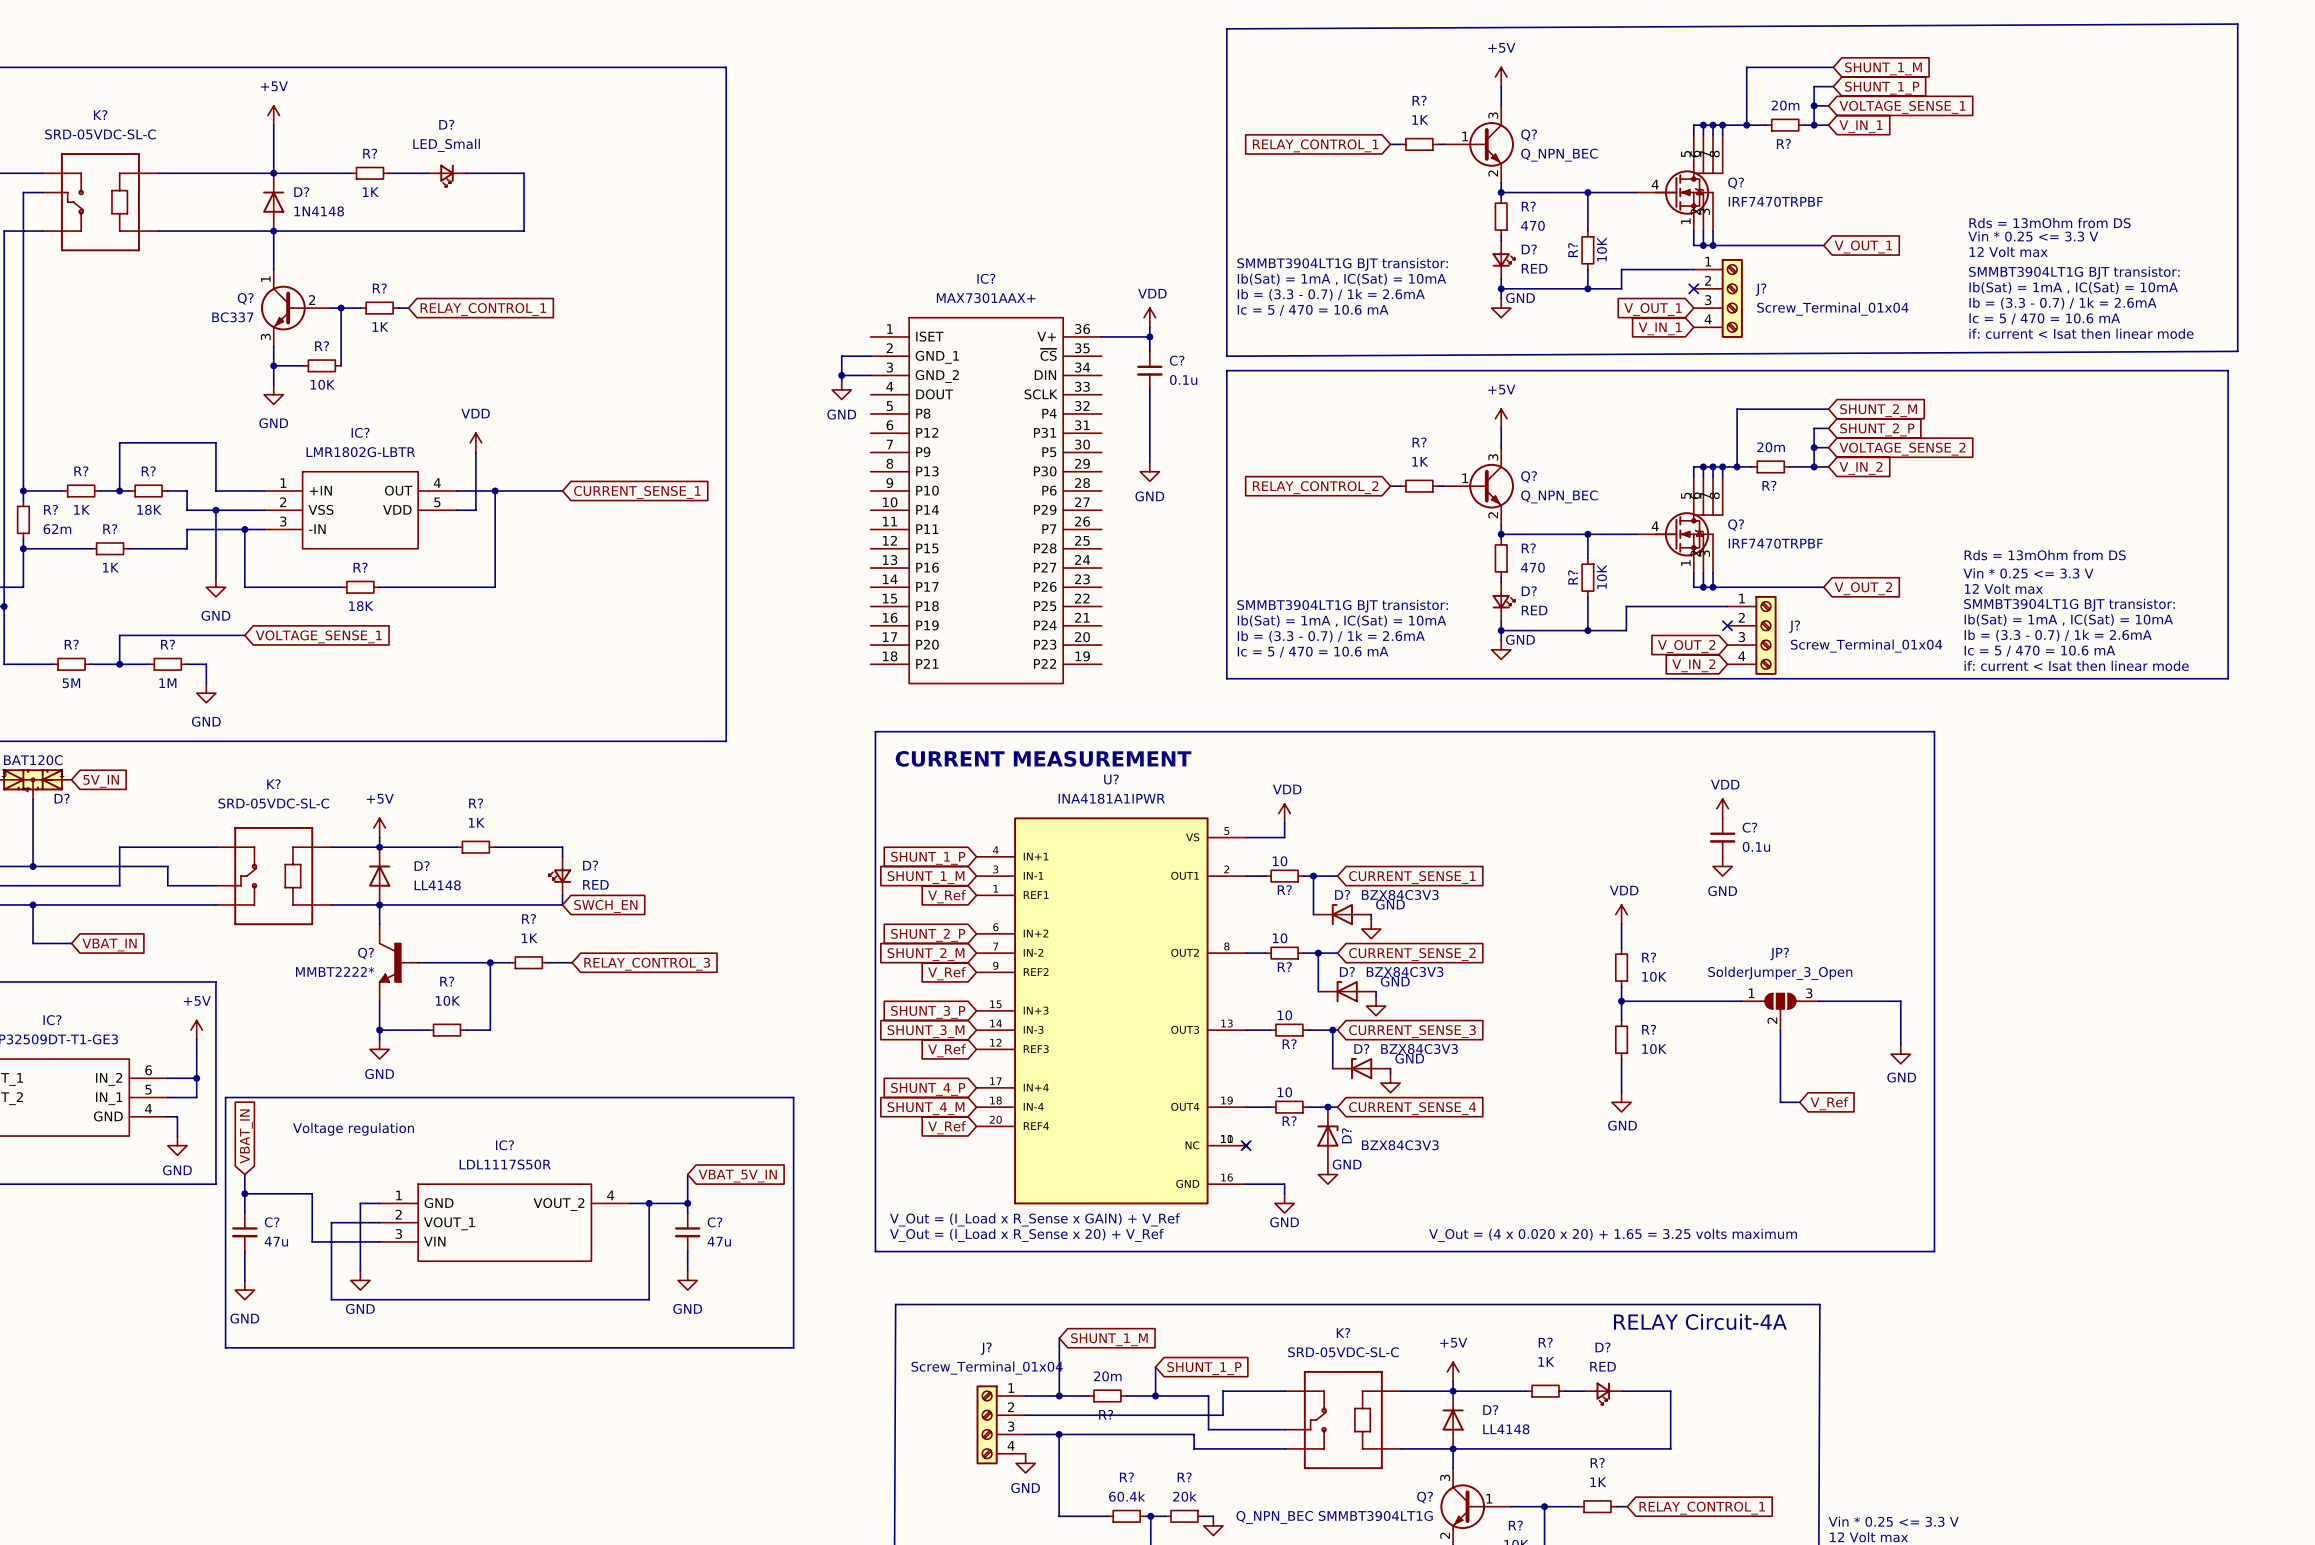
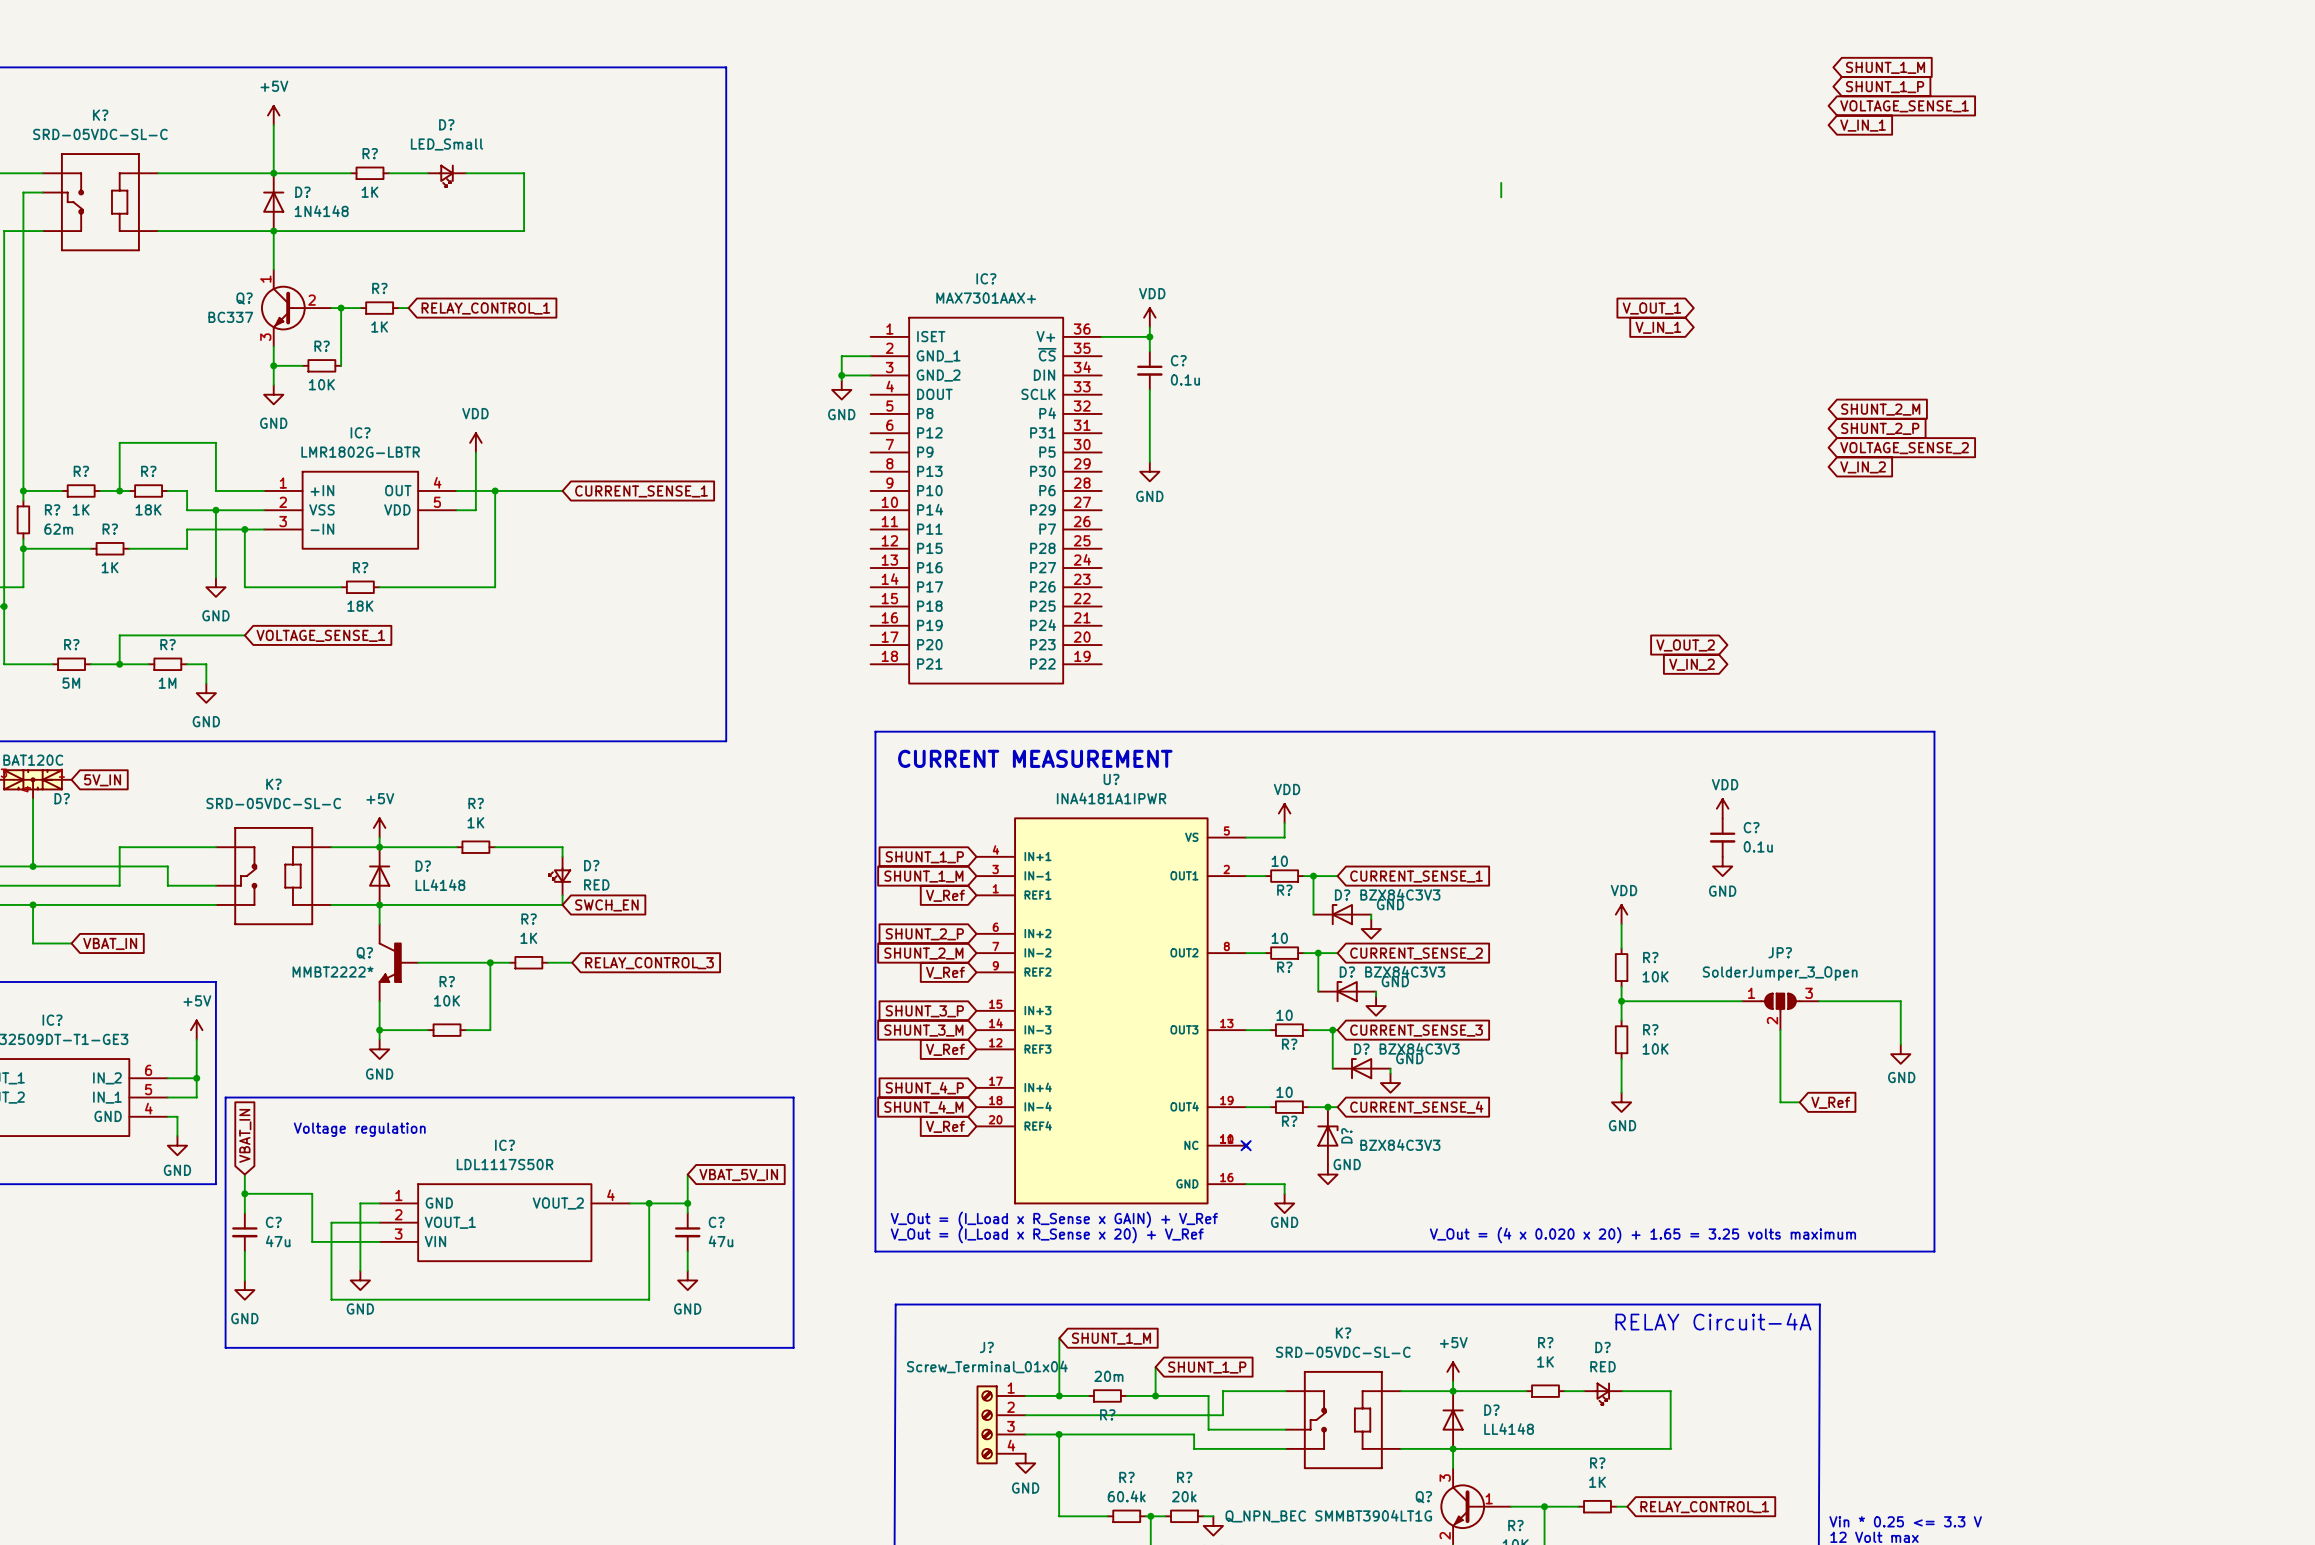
line: (2237, 24) (1226, 28) (1226, 356) (2237, 351) (2237, 24) -> none
wire: (1833, 67) (1746, 67) (1746, 125) -> none
power symbol: +5V (1501, 77) -> none
wire: (1501, 86) (1501, 105) -> none
wire: (1833, 86) (1814, 86) (1814, 125) -> none
wire: (1814, 105) (1828, 105) -> none
junction: (1814, 105) -> none
wire: (1703, 125) (1703, 134) -> none
junction: (1703, 125) -> none
wire: (1713, 125) (1713, 134) -> none
junction: (1713, 125) -> none
wire: (1722, 125) (1722, 134) -> none
junction: (1722, 125) -> none
junction: (1746, 125) -> none
wire: (1765, 125) (1693, 125) (1693, 134) -> none
R?: 20m (1785, 125) -> none
wire: (1804, 125) (1828, 125) -> none
junction: (1814, 125) -> none
wire: (1390, 144) (1400, 144) -> none
R?: 1K (1419, 144) -> none
wire: (1438, 144) (1443, 144) -> none
Q?: Q_NPN_BEC (1478, 144) -> none
global label: RELAY_CONTROL_1 (1315, 145) -> none
Q?: IRF7470TRPBF (1679, 182) -> none
wire: (1501, 192) (1636, 192) -> none
junction: (1501, 192) -> none
wire: (1587, 192) (1587, 231) -> none
junction: (1587, 192) -> none
R?: 470 (1501, 216) -> none
text: Rds = 13mOhm from DS (2050, 223) -> none
wire: (1693, 231) (1693, 245) (1823, 245) -> none
wire: (1703, 231) (1703, 245) -> none
wire: (1713, 231) (1713, 245) -> none
wire: (1501, 235) (1501, 240) -> none
text: Vin * 0.25 <= 3.3 V (2033, 236) -> none
junction: (1703, 245) -> none
junction: (1713, 245) -> none
global label: V_OUT_1 (1863, 246) -> none
R?: 10K (1587, 250) -> none
text: 12 Volt max (2008, 251) -> none
D?: RED (1503, 259) -> none
text: SMMBT3904LT1G BJT transistor: (1342, 264) -> none
wire: (1587, 269) (1587, 288) -> none
wire: (1693, 269) (1621, 269) (1621, 288) (1501, 288) -> none
text: SMMBT3904LT1G BJT transistor: (2074, 273) -> none
text: Ib(Sat) = 1mA , IC(Sat) = 10mA (1341, 279) -> none
wire: (1501, 279) (1501, 298) -> none
junction: (1501, 288) -> none
junction: (1587, 288) -> none
no-connect mark: (1693, 288) -> none
text: Ib(Sat) = 1mA , IC(Sat) = 10mA (2073, 288) -> none
text: Ib = (3.3 - 0.7) / 1k = 2.6mA (1331, 294) -> none
J?: Screw_Terminal_01x04 (1718, 298) -> none
text: Ib = (3.3 - 0.7) / 1k = 2.6mA (2062, 303) -> none
power symbol: GND (1501, 308) -> none
text: Ic = 5 / 470 = 10.6 mA (1313, 310) -> none
text: Ic = 5 / 470 = 10.6 mA (2044, 318) -> none
text: if: current < Isat then linear mode (2081, 333) -> none
line: (1226, 370) (1226, 678) (2228, 678) (2228, 370) (1226, 370) -> none
wire: (1828, 409) (1737, 409) (1737, 466) -> none
power symbol: +5V (1501, 418) -> none
wire: (1501, 428) (1501, 447) -> none
wire: (1828, 428) (1814, 428) (1814, 466) -> none
wire: (1814, 447) (1828, 447) -> none
junction: (1814, 447) -> none
wire: (1703, 466) (1703, 476) -> none
junction: (1703, 466) -> none
wire: (1713, 466) (1713, 476) -> none
junction: (1713, 466) -> none
wire: (1722, 466) (1722, 476) -> none
junction: (1722, 466) -> none
junction: (1737, 466) -> none
wire: (1751, 466) (1693, 466) (1693, 476) -> none
R?: 20m (1770, 466) -> none
wire: (1790, 466) (1828, 466) -> none
junction: (1814, 466) -> none
wire: (1390, 486) (1400, 486) -> none
R?: 1K (1419, 486) -> none
wire: (1438, 486) (1443, 486) -> none
Q?: Q_NPN_BEC (1478, 486) -> none
global label: RELAY_CONTROL_2 (1315, 487) -> none
wire: (1501, 524) (1501, 539) -> none
Q?: IRF7470TRPBF (1679, 524) -> none
wire: (1501, 534) (1636, 534) -> none
junction: (1501, 534) -> none
wire: (1587, 534) (1587, 558) -> none
junction: (1587, 534) -> none
text: Rds = 13mOhm from DS (2045, 555) -> none
R?: 470 (1501, 558) -> none
wire: (1693, 572) (1693, 587) (1823, 587) -> none
wire: (1703, 572) (1703, 587) -> none
wire: (1713, 572) (1713, 587) -> none
text: Vin * 0.25 <= 3.3 V (2028, 573) -> none
wire: (1501, 577) (1501, 582) -> none
R?: 10K (1587, 577) -> none
junction: (1703, 587) -> none
junction: (1713, 587) -> none
global label: V_OUT_2 (1863, 588) -> none
text: 12 Volt max (2003, 588) -> none
wire: (1587, 596) (1587, 630) -> none
D?: RED (1503, 601) -> none
text: SMMBT3904LT1G BJT transistor: (2069, 605) -> none
text: SMMBT3904LT1G BJT transistor: (1342, 606) -> none
wire: (1727, 606) (1626, 606) (1626, 630) (1501, 630) -> none
wire: (1501, 620) (1501, 640) -> none
text: Ib(Sat) = 1mA , IC(Sat) = 10mA (2068, 620) -> none
text: Ib(Sat) = 1mA , IC(Sat) = 10mA (1341, 621) -> none
no-connect mark: (1727, 625) -> none
junction: (1501, 630) -> none
junction: (1587, 630) -> none
J?: Screw_Terminal_01x04 (1752, 635) -> none
text: Ib = (3.3 - 0.7) / 1k = 2.6mA (2058, 635) -> none
text: Ib = (3.3 - 0.7) / 1k = 2.6mA (1331, 636) -> none
power symbol: GND (1501, 649) -> none
text: Ic = 5 / 470 = 10.6 mA (2039, 651) -> none
text: Ic = 5 / 470 = 10.6 mA (1313, 652) -> none
text: if: current < Isat then linear mode (2076, 665) -> none

